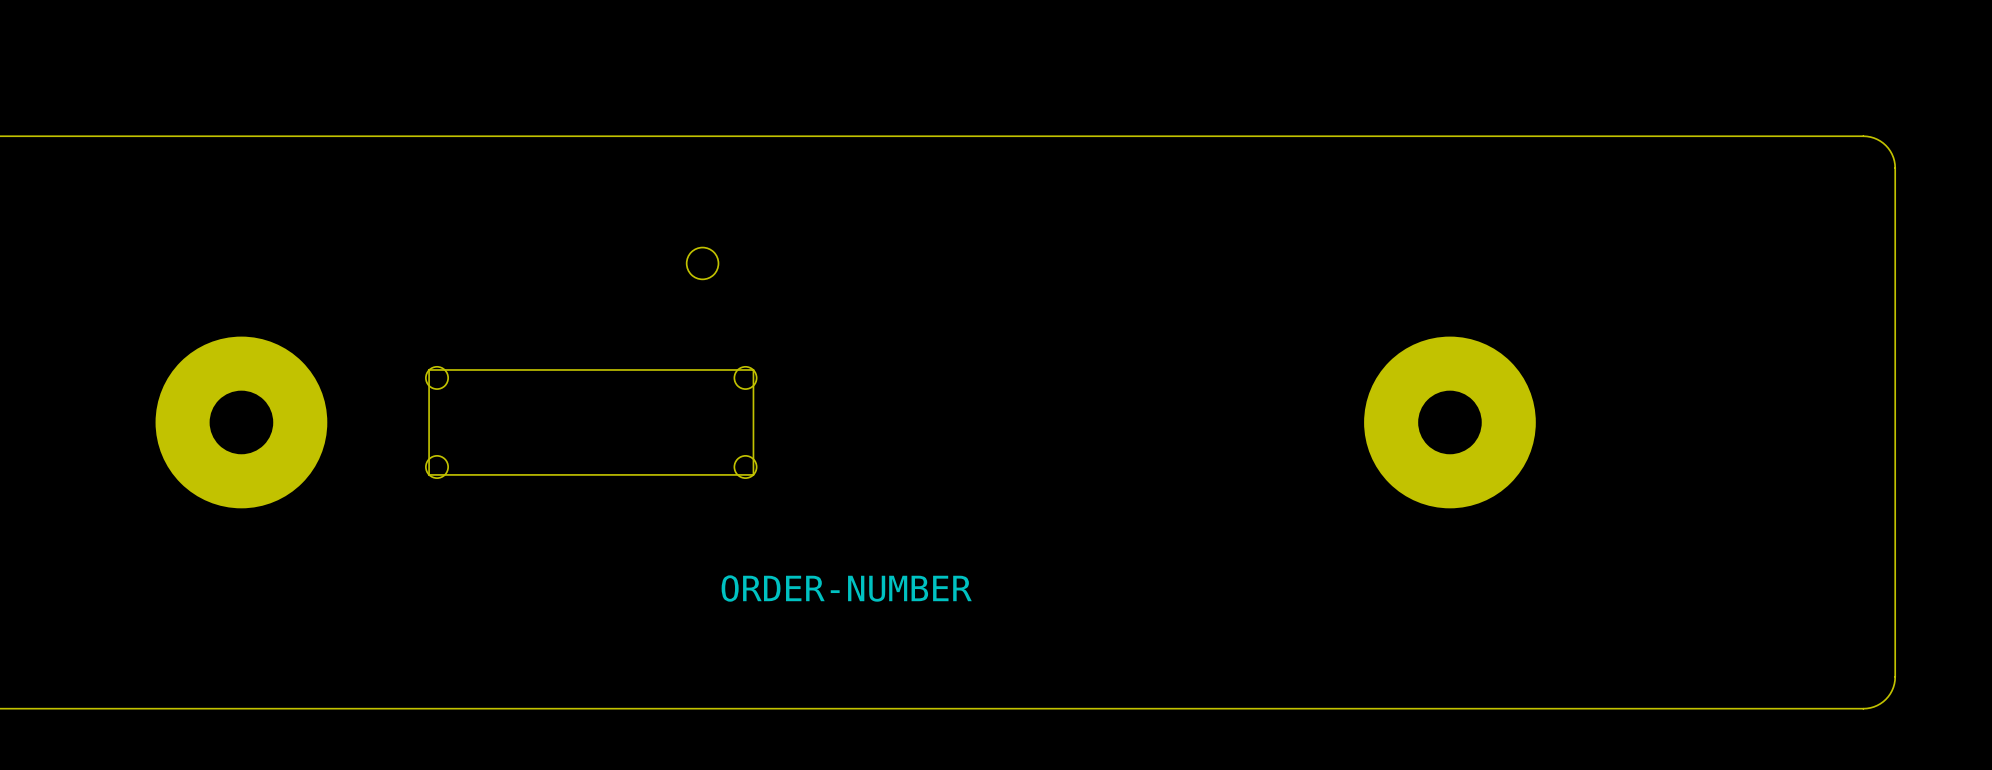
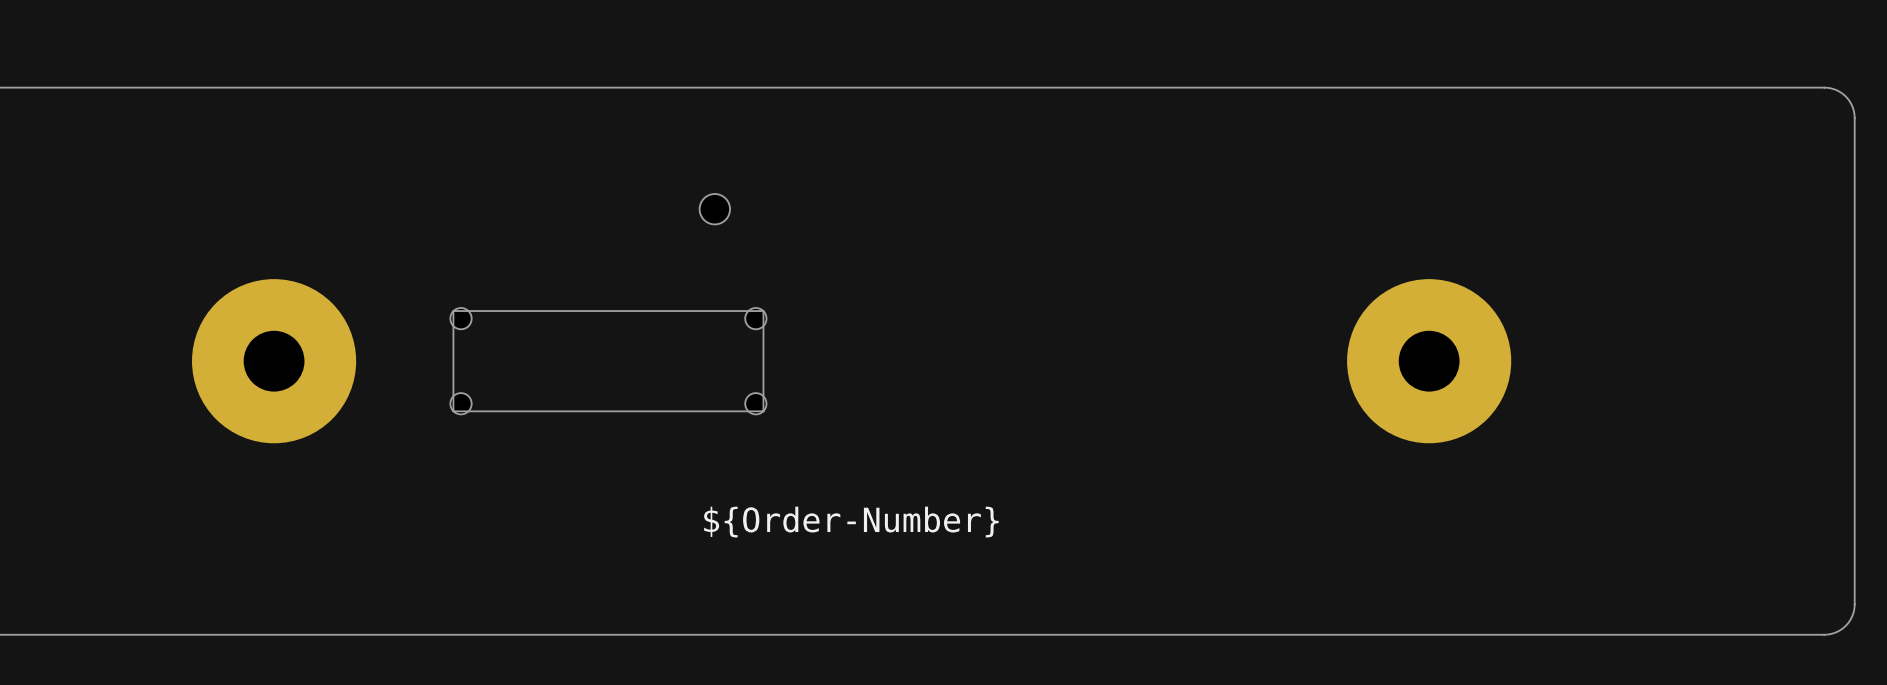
drawing shape: [721, 575, 972, 602] -> [704, 506, 999, 538]

